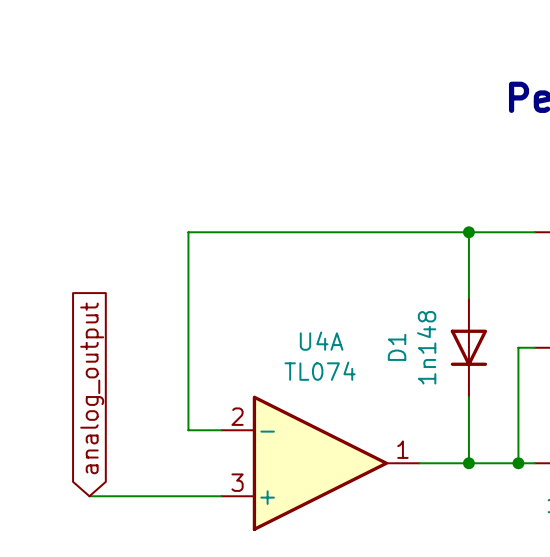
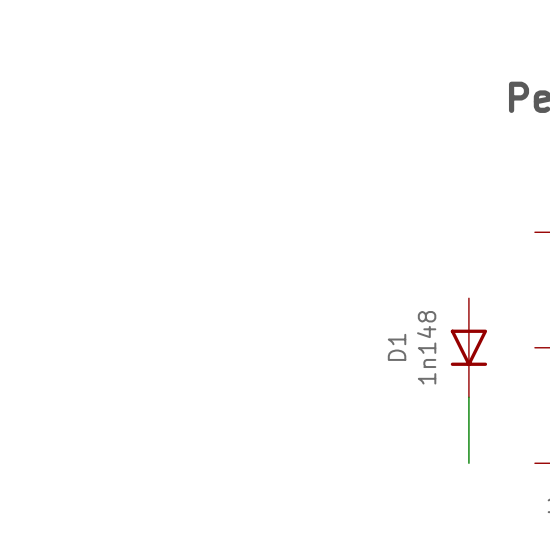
wire: (468, 232) (468, 298) -> none
junction: (468, 232) -> none
wire: (534, 232) (188, 232) (188, 430) (221, 430) -> none
wire: (534, 347) (518, 347) (518, 463) -> none
global label: analog_output (92, 388) -> none
U4A: TL074 (320, 463) -> none
wire: (419, 463) (534, 463) -> none
junction: (468, 463) -> none
junction: (518, 463) -> none
wire: (89, 496) (221, 496) -> none

